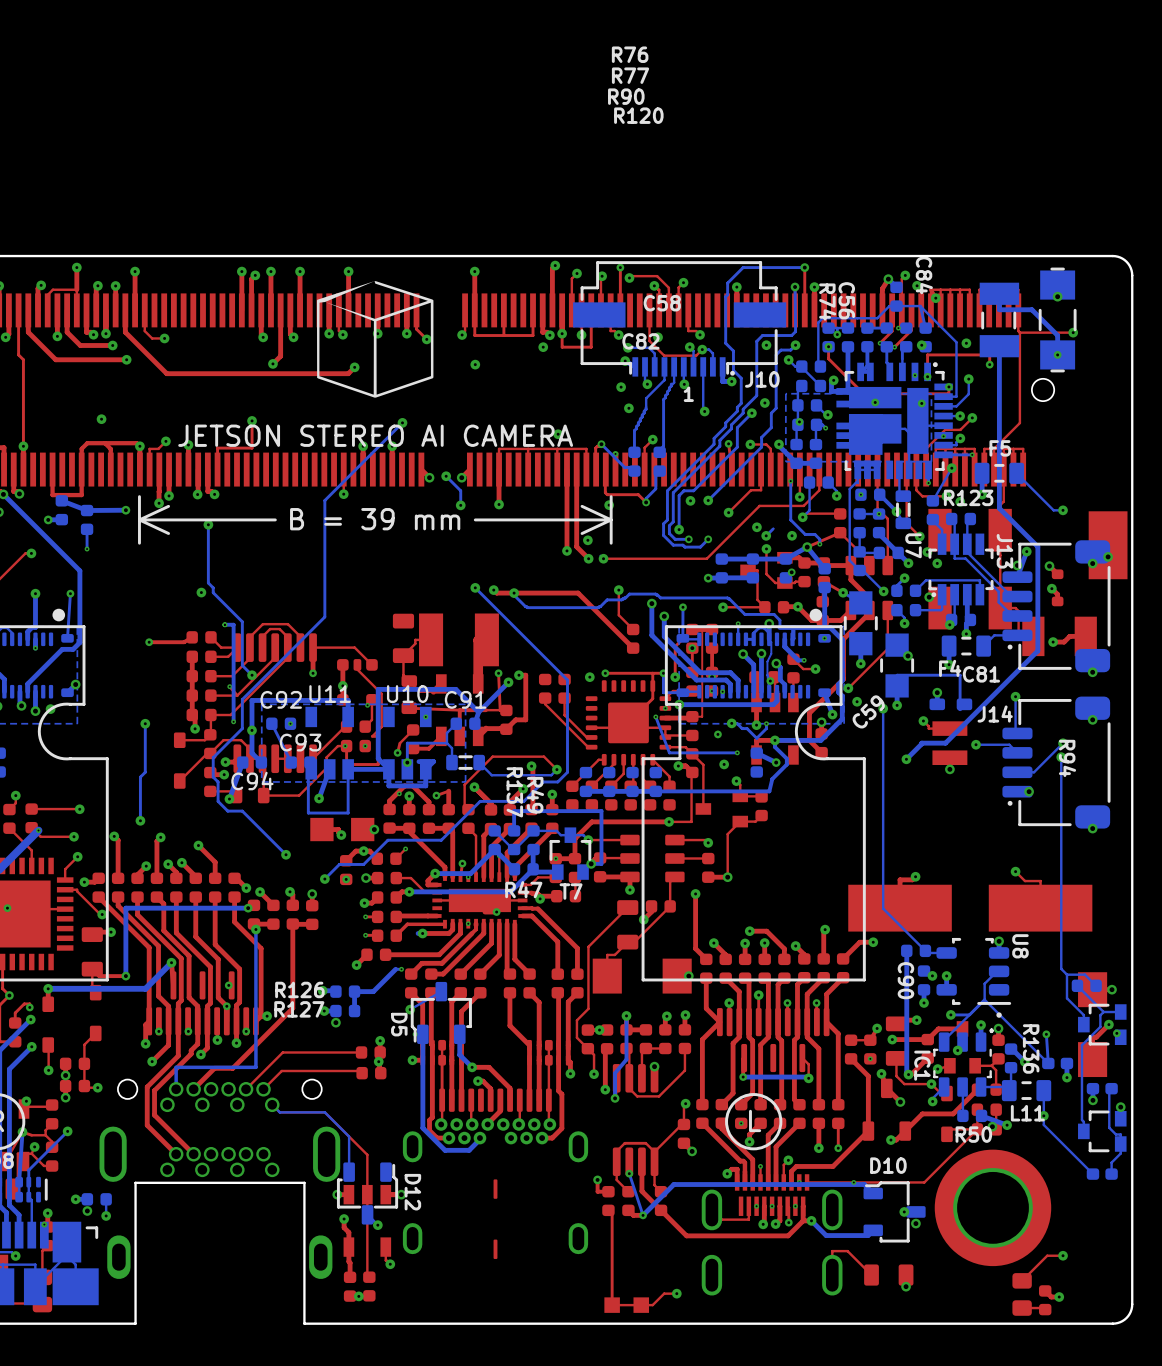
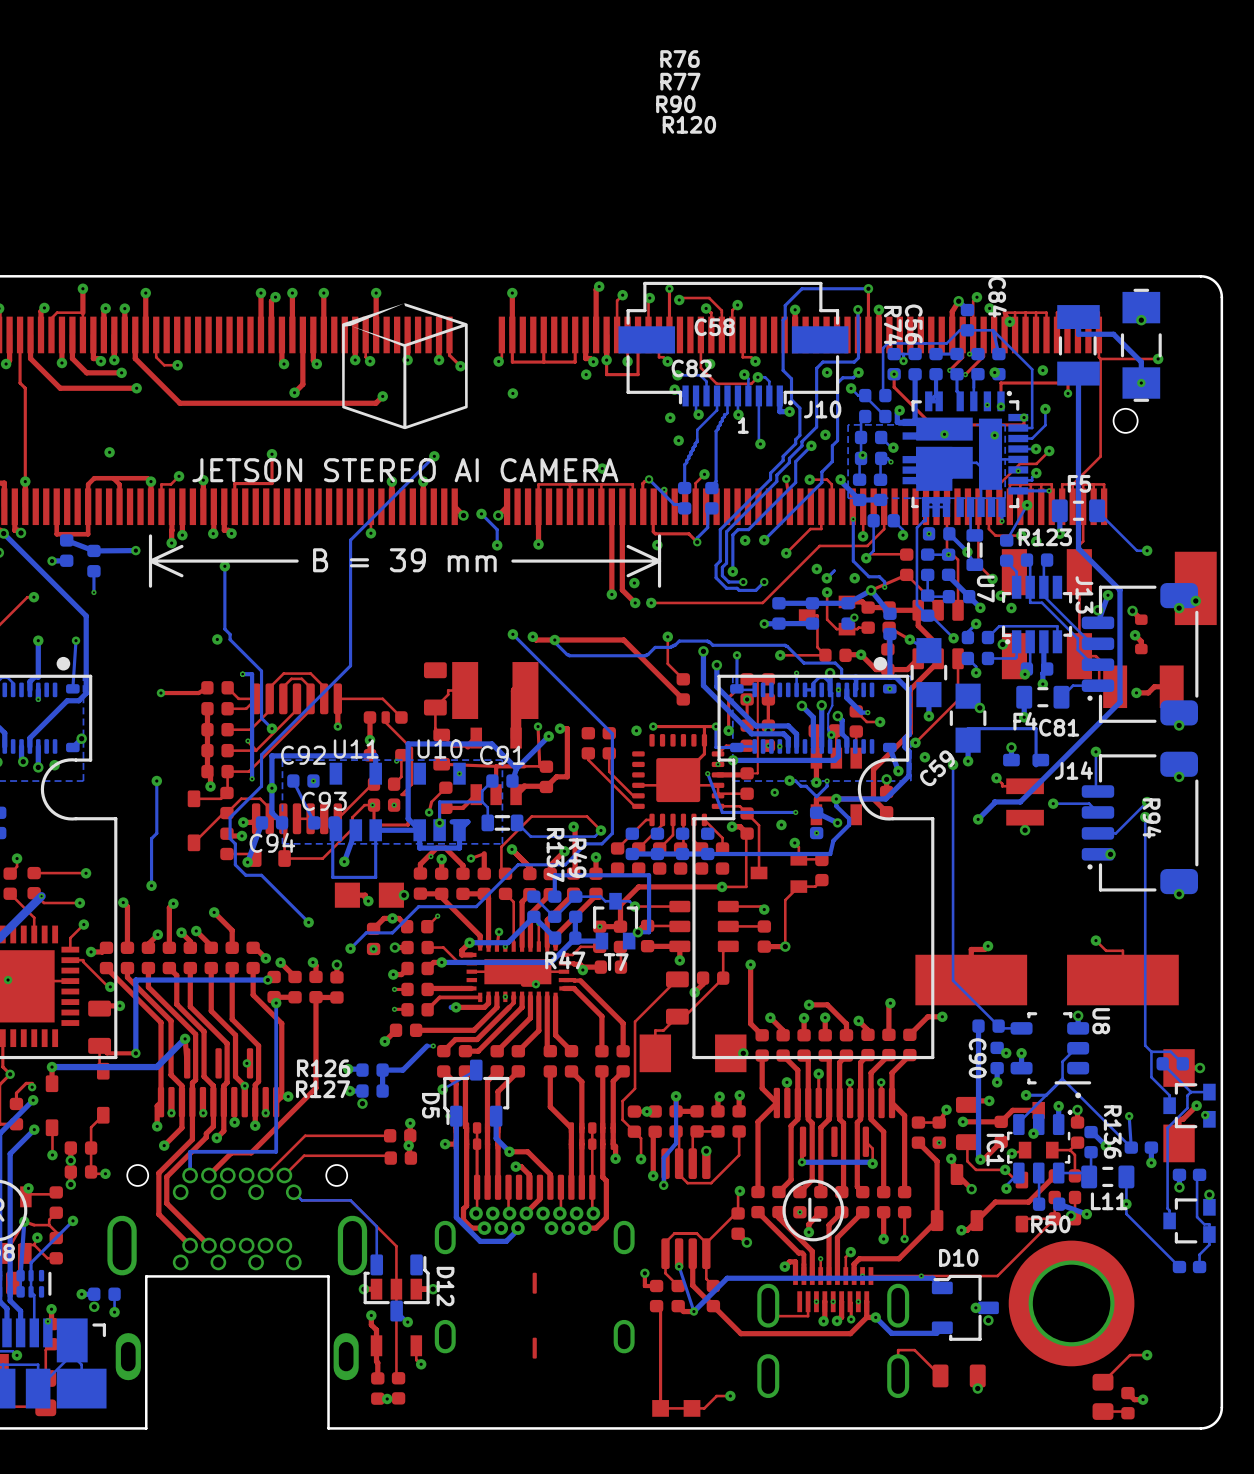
via: none -> (838, 689)
via: none -> (816, 833)

